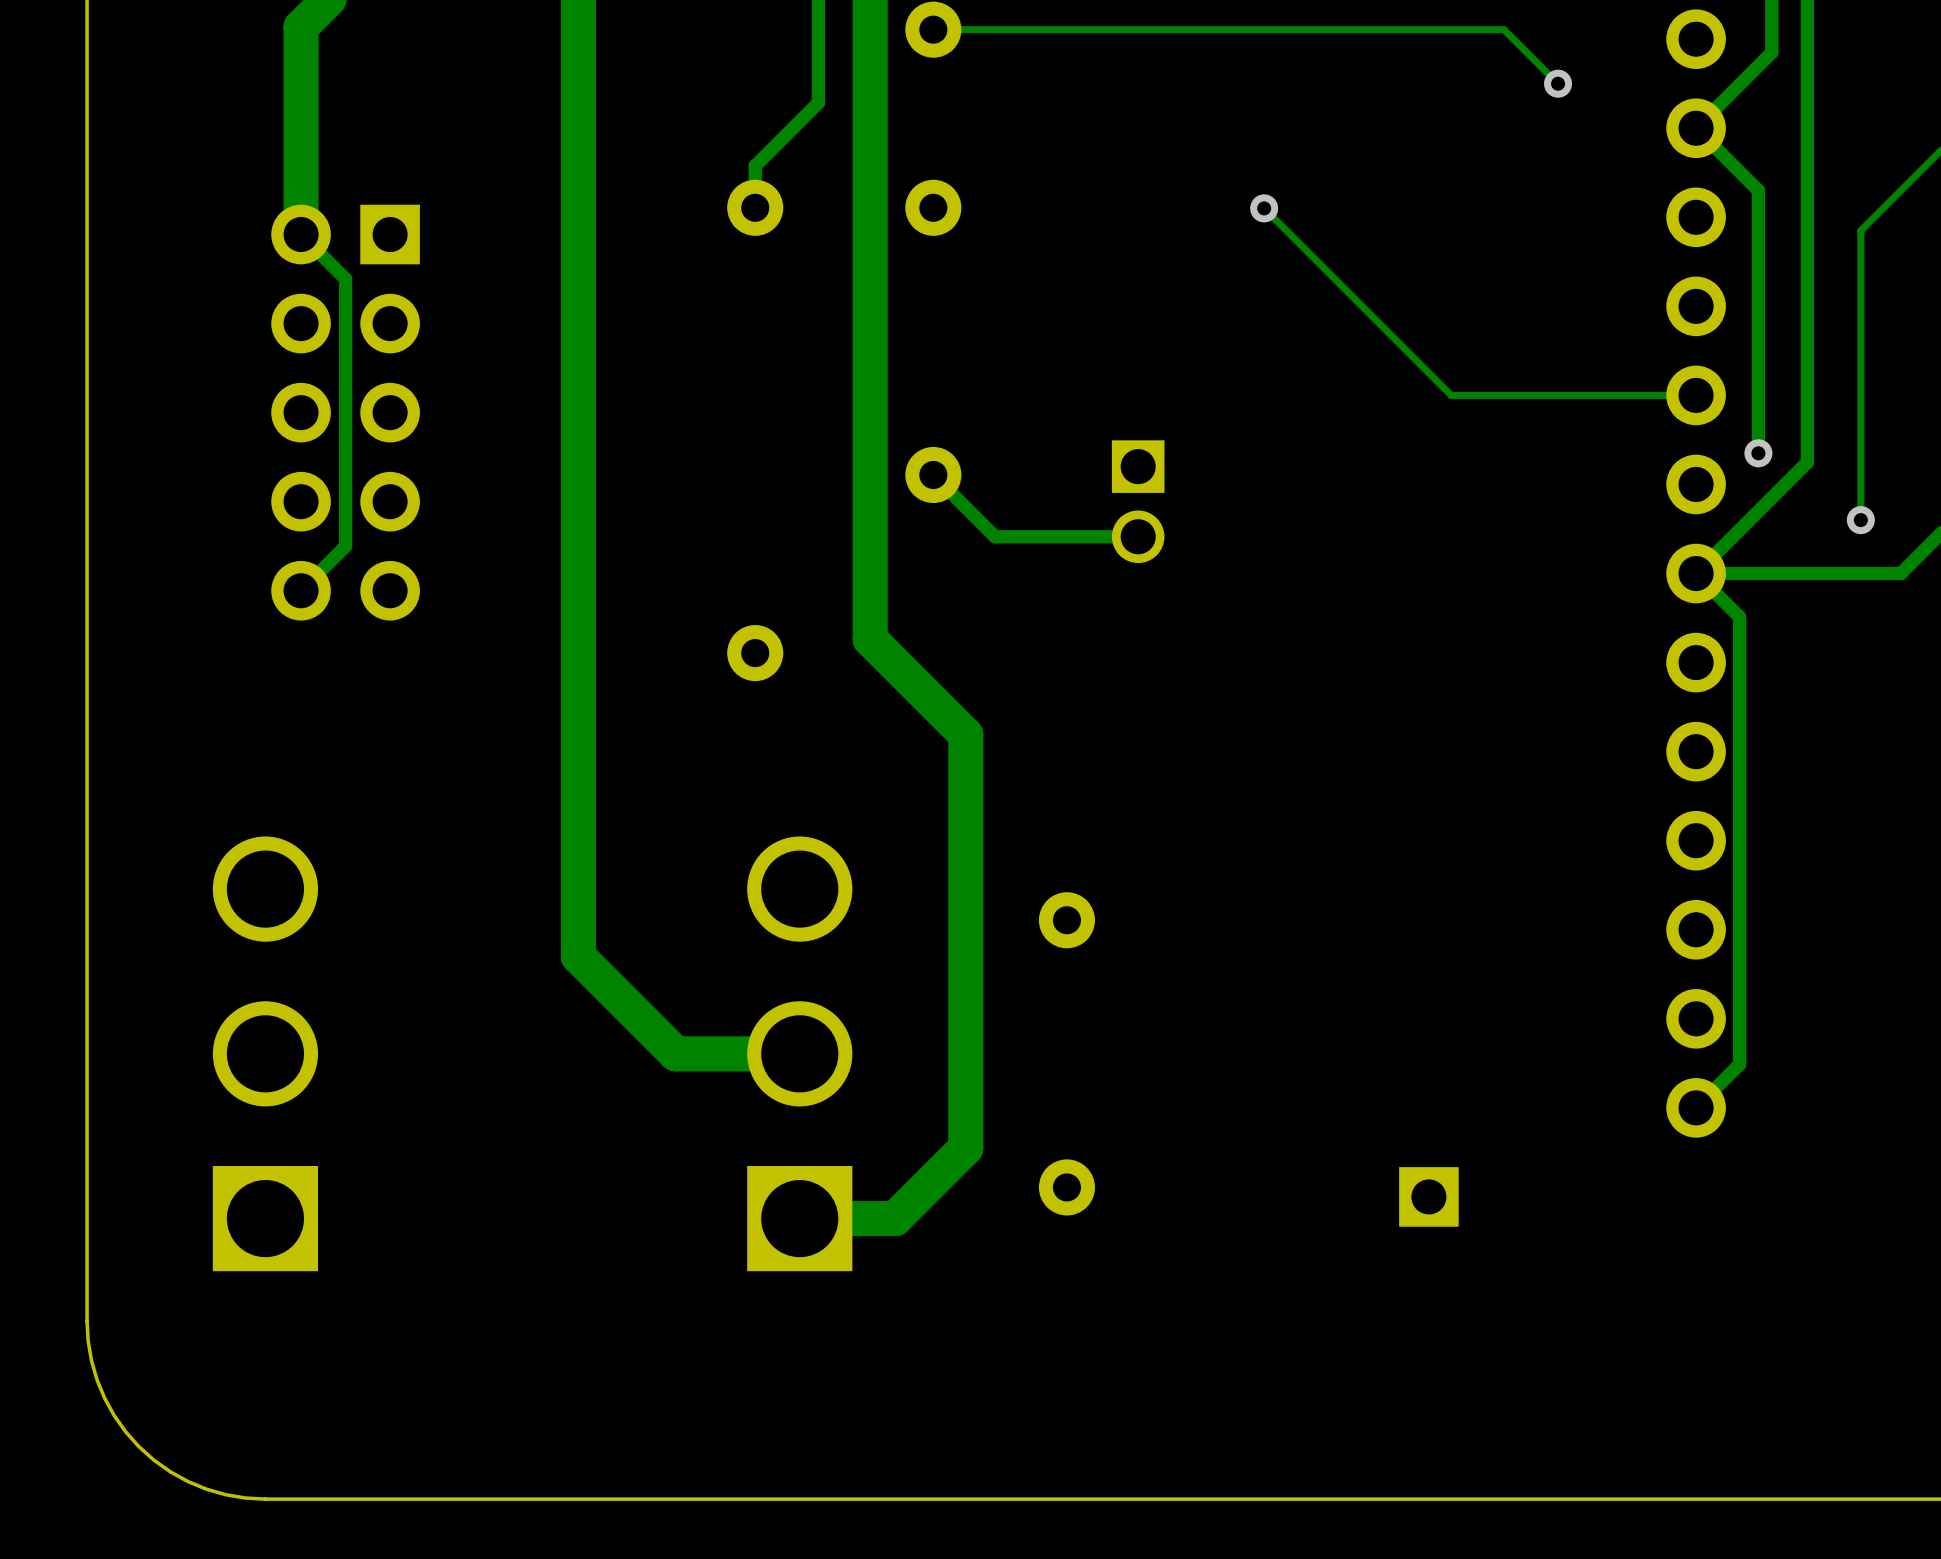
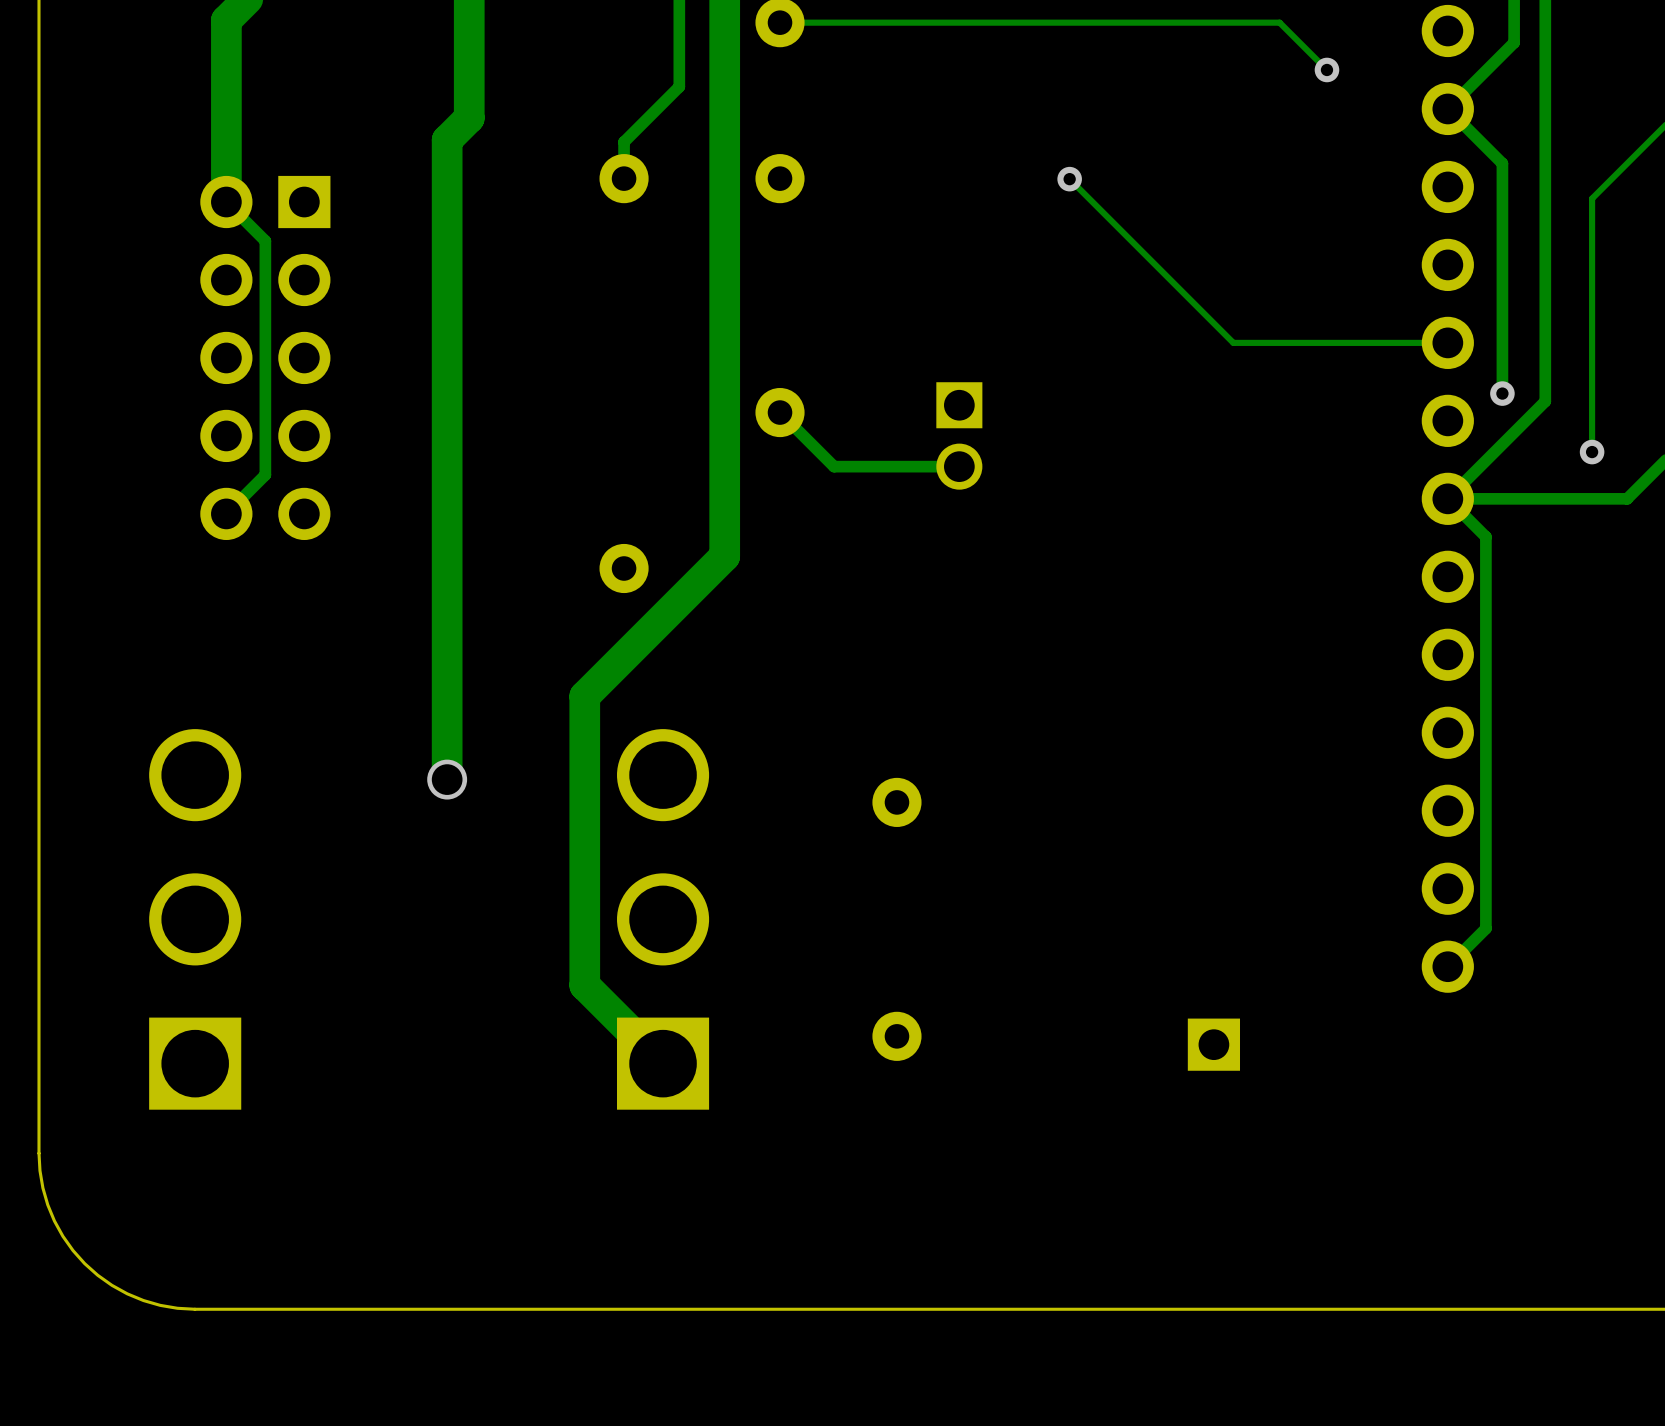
track: (578, 138) (578, 956) (675, 1053) (799, 1053) -> (469, 118) (447, 140) (447, 779)
track: (870, 639) (965, 734) (965, 1147) (895, 1218) (799, 1218) -> (724, 556) (584, 696) (584, 985) (663, 1063)
via: none -> (447, 779)

